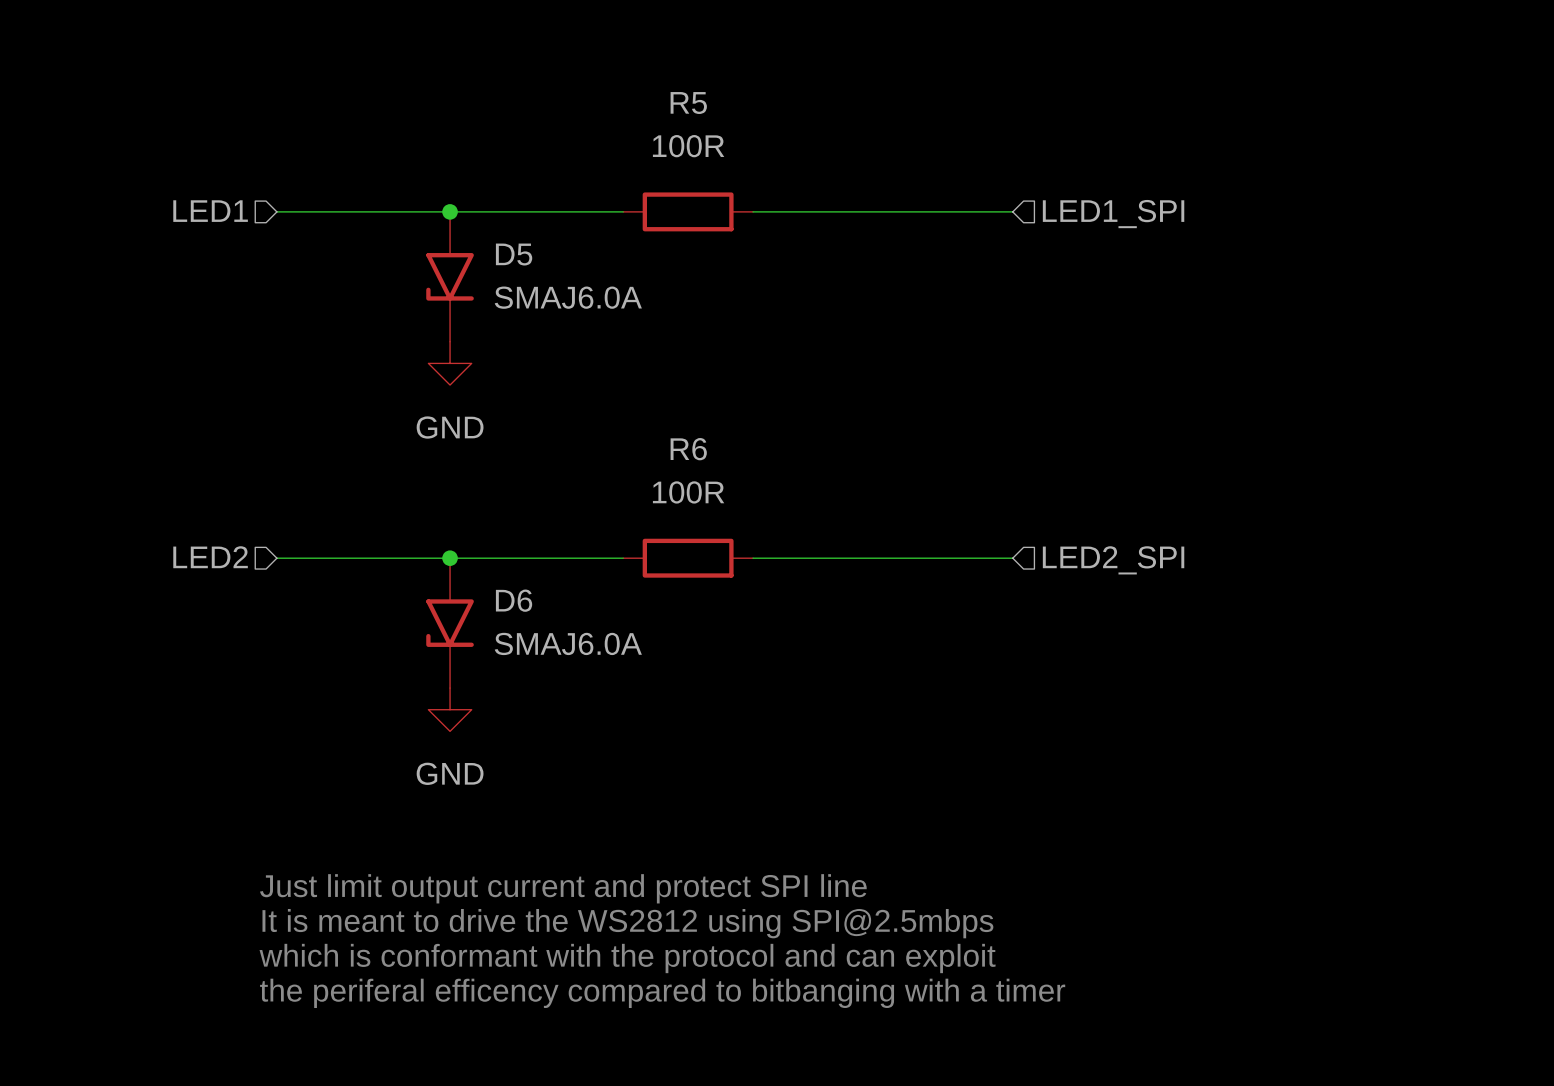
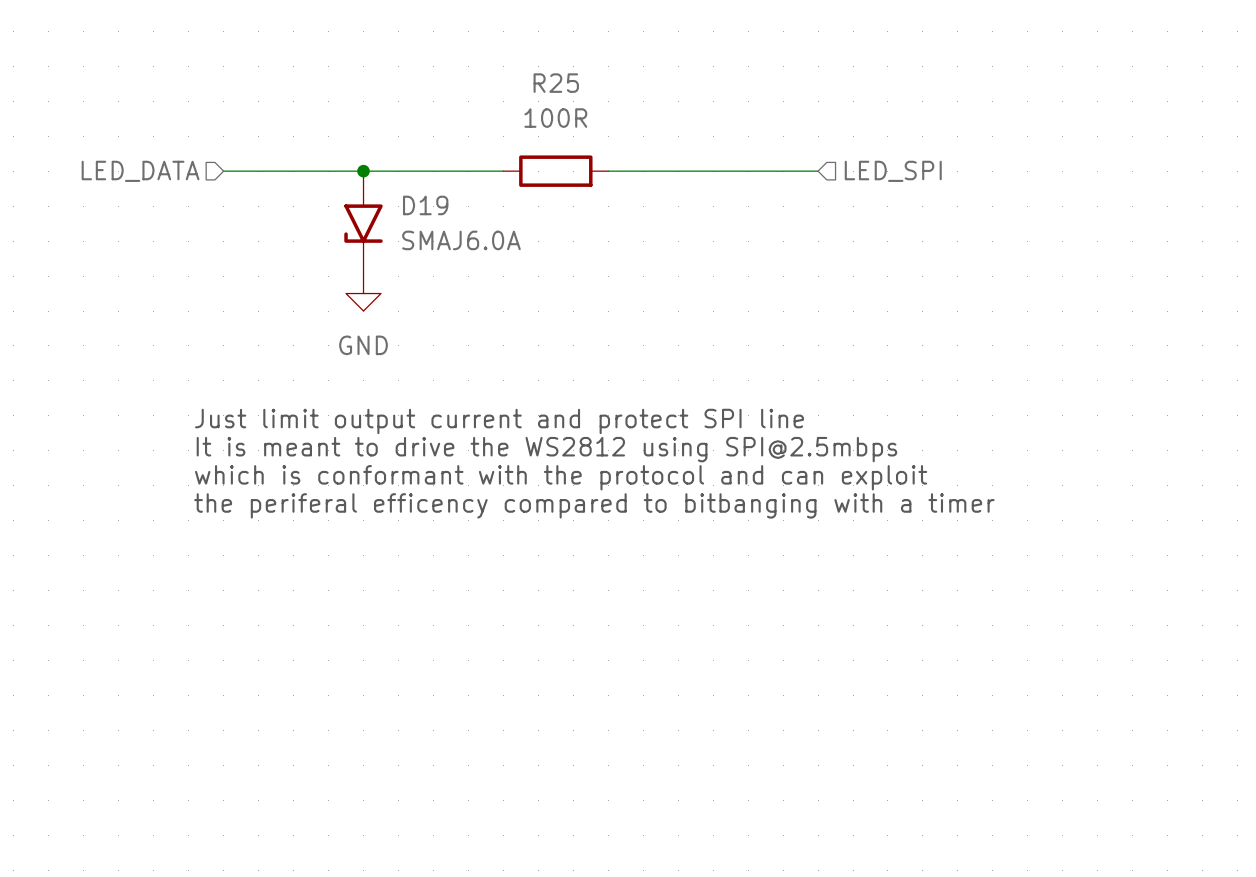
R5 name: R5 (688, 103) -> R25 (556, 83)
hierarchical label: LED1 (210, 211) -> LED_DATA (140, 171)
hierarchical label: LED1_SPI (1113, 214) -> LED_SPI (893, 171)
D5 name: D5 (514, 254) -> D19 (425, 205)
hierarchical label: LED2 (210, 557) -> none
wire: (276, 558) (623, 558) -> none
junction: (450, 558) -> none
R6: 100R (688, 558) -> none
wire: (753, 558) (1012, 558) -> none
hierarchical label: LED2_SPI (1113, 560) -> none
D6: SMAJ6.0A (450, 623) -> none
power symbol: GND (450, 709) -> none
text position: Just limit output current and protect SPI line (563, 888) -> Just limit output current and protect SPI line (499, 421)
text position: It is meant to drive the WS2812 using SPI@2.5mbps (627, 923) -> It is meant to drive the WS2812 using SPI@2.5mbps (546, 449)
text position: which is conformant with the protocol and can exploit (627, 958) -> which is conformant with the protocol and can exploit (561, 477)
text position: the periferal efficency compared to bitbanging with a timer (662, 993) -> the periferal efficency compared to bitbanging with a timer (594, 505)

